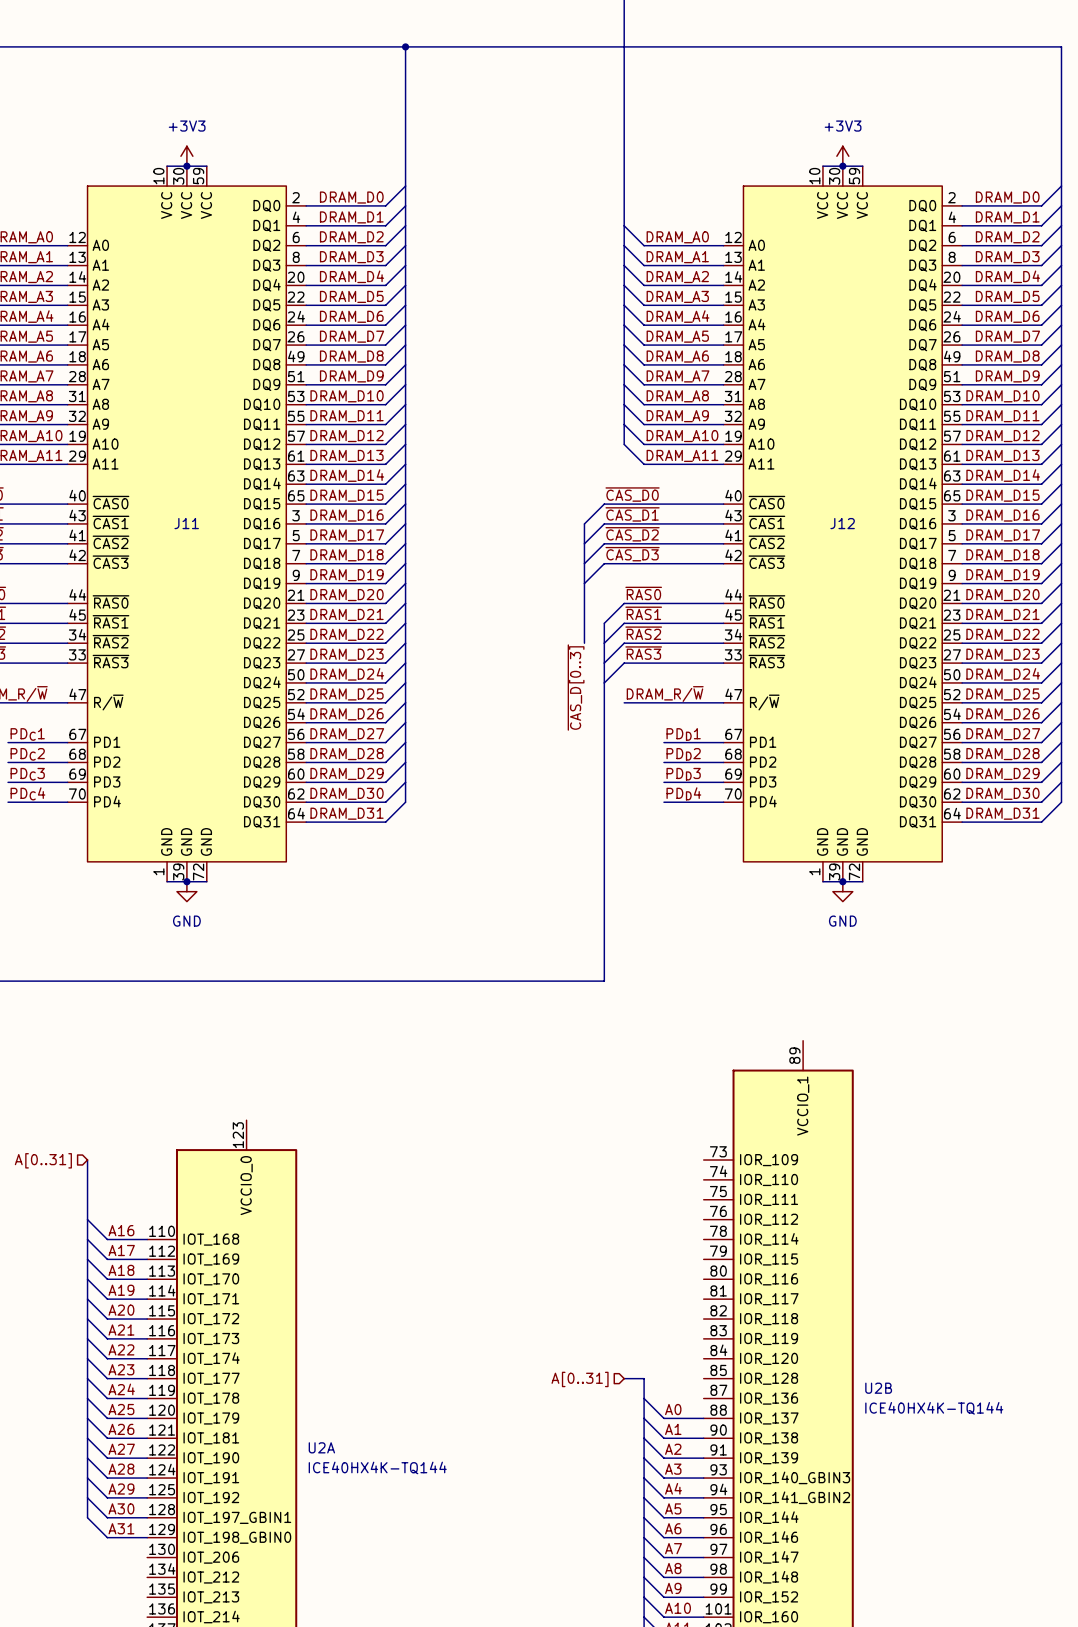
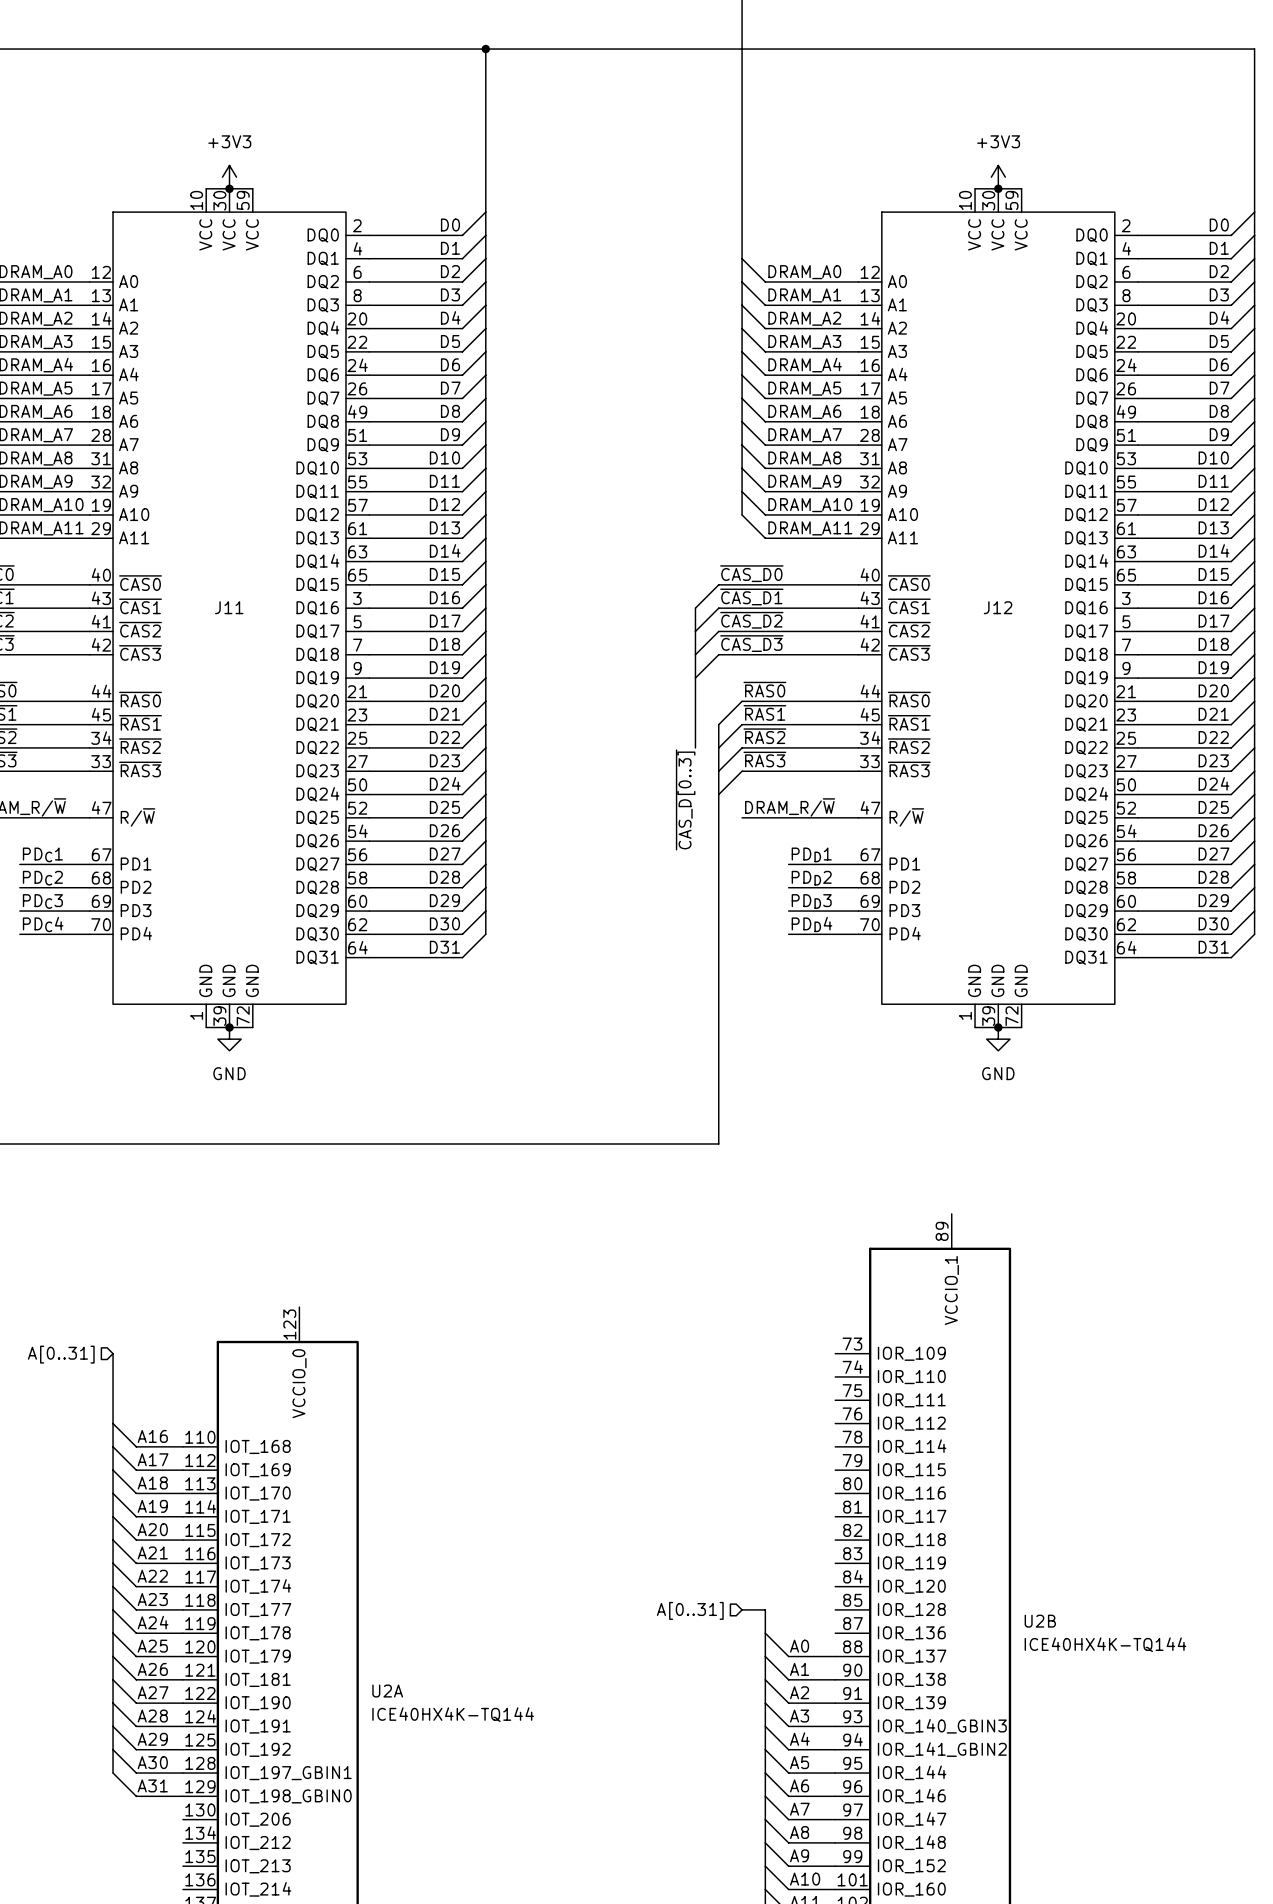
label: DRAM_D0 (351, 197) -> D0 (450, 225)
label: DRAM_D0 (1007, 197) -> D0 (1219, 225)
label: DRAM_D1 (351, 217) -> D1 (450, 248)
label: DRAM_D1 (1007, 217) -> D1 (1219, 248)
label: DRAM_D2 (351, 237) -> D2 (450, 271)
label: DRAM_D2 (1007, 237) -> D2 (1219, 271)
label: DRAM_D3 (351, 257) -> D3 (450, 294)
label: DRAM_D3 (1007, 257) -> D3 (1219, 294)
label: DRAM_D4 (352, 276) -> D4 (450, 317)
label: DRAM_D4 (1007, 276) -> D4 (1219, 317)
label: DRAM_D5 (351, 296) -> D5 (450, 341)
label: DRAM_D5 (1007, 296) -> D5 (1219, 341)
label: DRAM_D6 (351, 316) -> D6 (450, 364)
label: DRAM_D6 (1007, 316) -> D6 (1219, 364)
label: DRAM_D7 (352, 336) -> D7 (450, 388)
label: DRAM_D7 (1007, 336) -> D7 (1219, 388)
label: DRAM_D8 (351, 356) -> D8 (450, 411)
label: DRAM_D8 (1007, 356) -> D8 (1219, 411)
label: DRAM_D9 (351, 376) -> D9 (450, 434)
label: DRAM_D9 (1007, 376) -> D9 (1219, 434)
label: DRAM_D10 (347, 396) -> D10 (444, 457)
label: DRAM_D10 (1002, 396) -> D10 (1213, 457)
label: DRAM_D11 (347, 416) -> D11 (444, 481)
label: DRAM_D11 (1002, 416) -> D11 (1213, 481)
label: DRAM_D12 (347, 436) -> D12 (444, 504)
label: DRAM_D12 (1002, 436) -> D12 (1213, 504)
label: DRAM_D13 (347, 455) -> D13 (444, 527)
label: DRAM_D13 (1002, 455) -> D13 (1213, 527)
label: DRAM_D14 (347, 475) -> D14 (445, 550)
label: DRAM_D14 (1003, 475) -> D14 (1214, 550)
label: DRAM_D15 (347, 495) -> D15 (444, 574)
label: DRAM_D15 (1002, 495) -> D15 (1213, 574)
label: DRAM_D16 (347, 515) -> D16 (444, 597)
label: DRAM_D16 (1002, 515) -> D16 (1213, 597)
label: DRAM_D17 (347, 535) -> D17 (445, 621)
label: DRAM_D17 (1003, 535) -> D17 (1214, 621)
label: DRAM_D18 (347, 555) -> D18 (444, 644)
label: DRAM_D18 (1002, 555) -> D18 (1213, 644)
label: DRAM_D19 (347, 575) -> D19 (444, 667)
label: DRAM_D19 (1002, 575) -> D19 (1213, 667)
label: DRAM_D20 (347, 595) -> D20 (444, 690)
label: DRAM_D20 (1002, 595) -> D20 (1213, 690)
label: DRAM_D21 (347, 614) -> D21 (444, 714)
label: DRAM_D21 (1002, 614) -> D21 (1213, 714)
label: DRAM_D22 (347, 634) -> D22 (444, 737)
label: DRAM_D22 (1002, 634) -> D22 (1213, 737)
label: DRAM_D23 (347, 654) -> D23 (444, 760)
label: DRAM_D23 (1002, 654) -> D23 (1213, 760)
label: DRAM_D24 (347, 674) -> D24 (445, 783)
label: DRAM_D24 (1003, 674) -> D24 (1214, 783)
label: DRAM_D25 (347, 694) -> D25 (444, 807)
label: DRAM_D25 (1002, 694) -> D25 (1213, 807)
label: DRAM_D26 (347, 714) -> D26 (444, 830)
label: DRAM_D26 (1002, 714) -> D26 (1213, 830)
label: DRAM_D27 (347, 734) -> D27 (445, 854)
label: DRAM_D27 (1003, 734) -> D27 (1214, 854)
label: DRAM_D28 (347, 754) -> D28 (444, 877)
label: DRAM_D28 (1002, 754) -> D28 (1213, 877)
label: DRAM_D29 (347, 773) -> D29 (444, 900)
label: DRAM_D29 (1002, 773) -> D29 (1213, 900)
label: DRAM_D30 (347, 793) -> D30 (444, 923)
label: DRAM_D30 (1002, 793) -> D30 (1213, 923)
label: DRAM_D31 (347, 813) -> D31 (444, 947)
label: DRAM_D31 (1002, 813) -> D31 (1213, 947)

